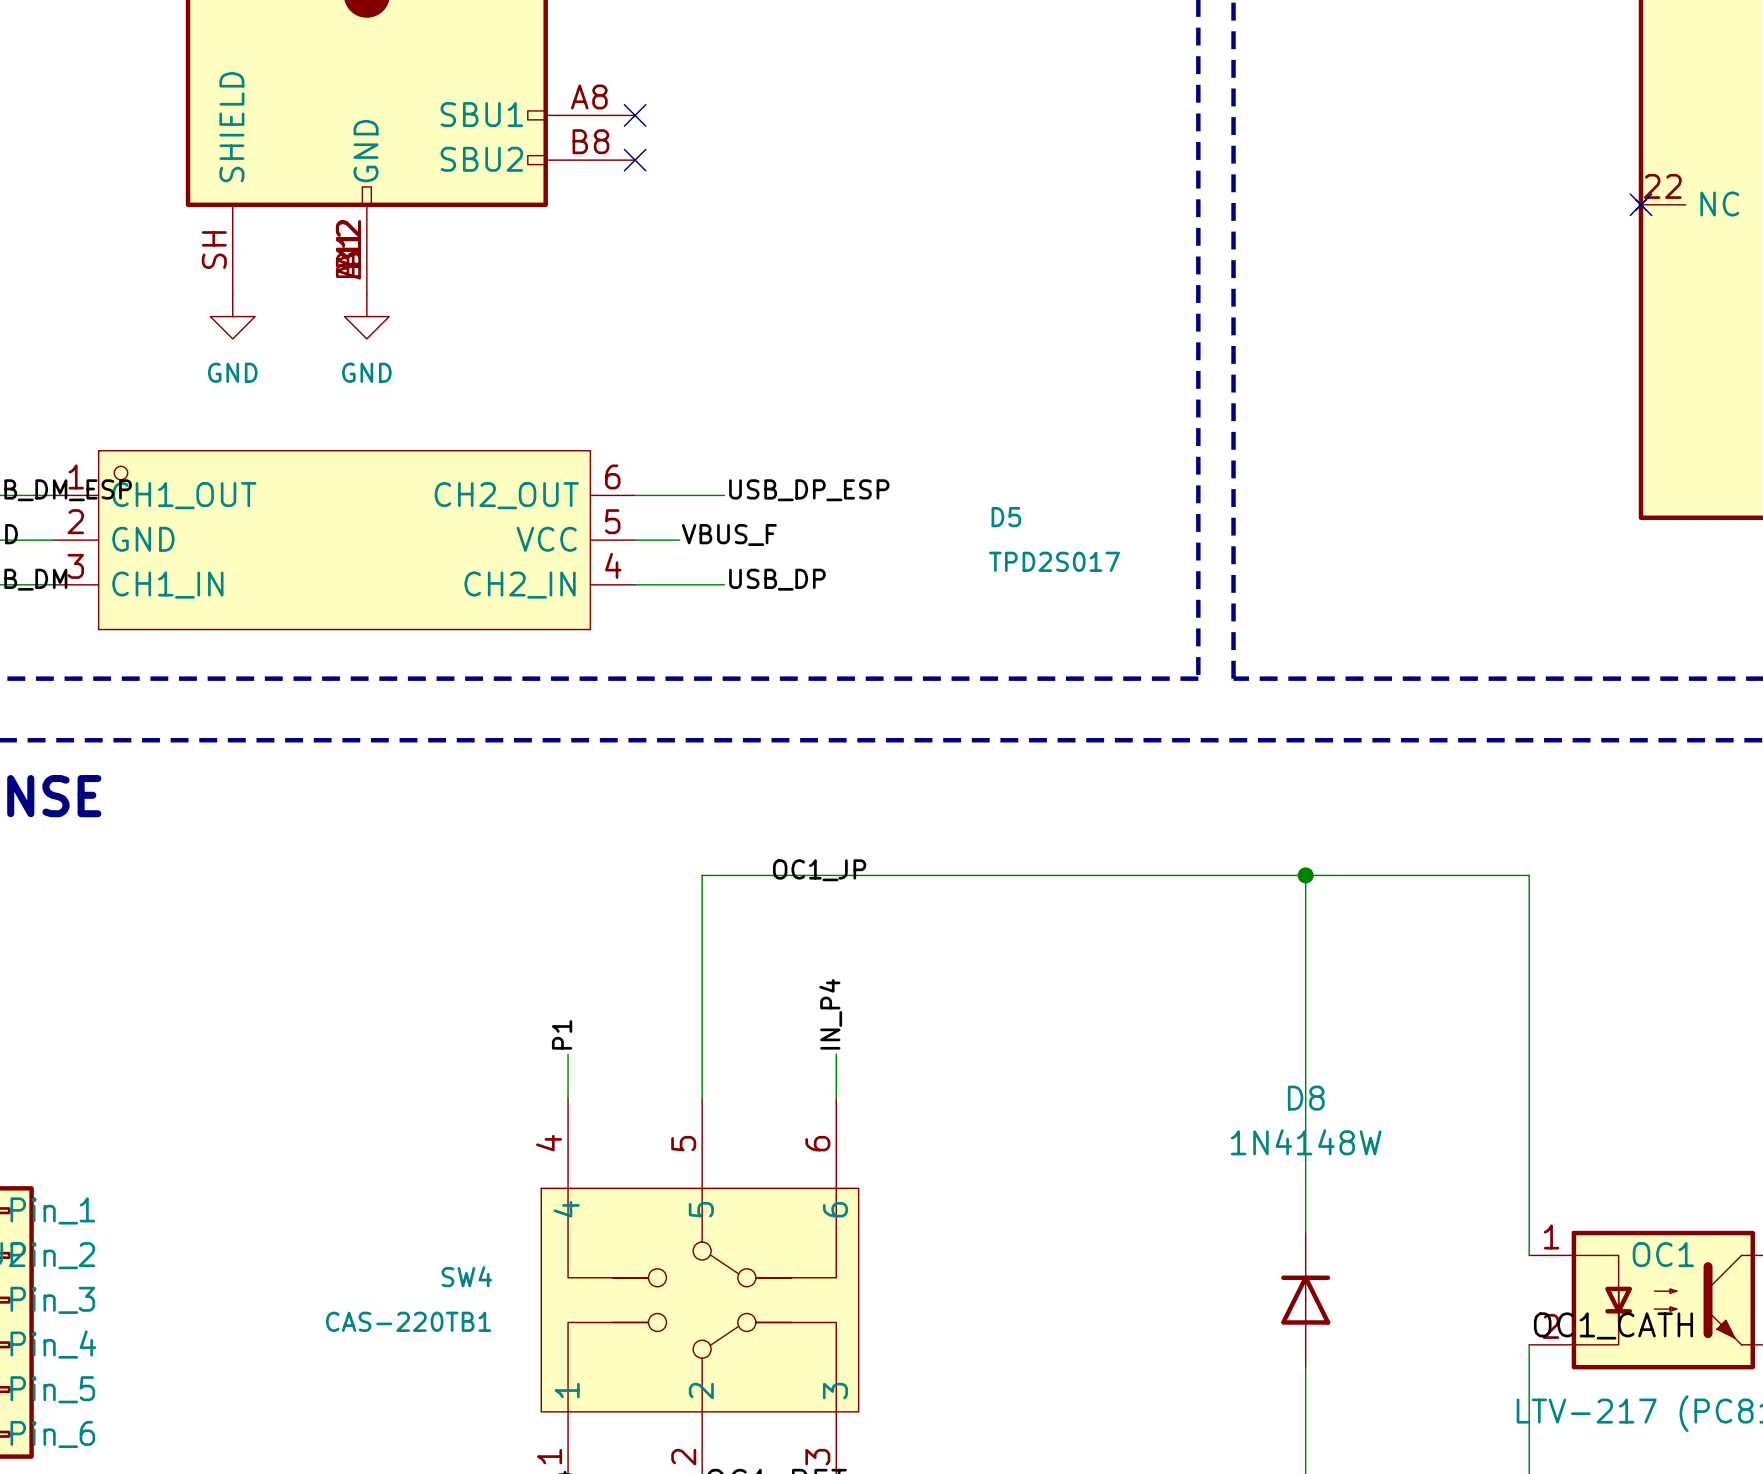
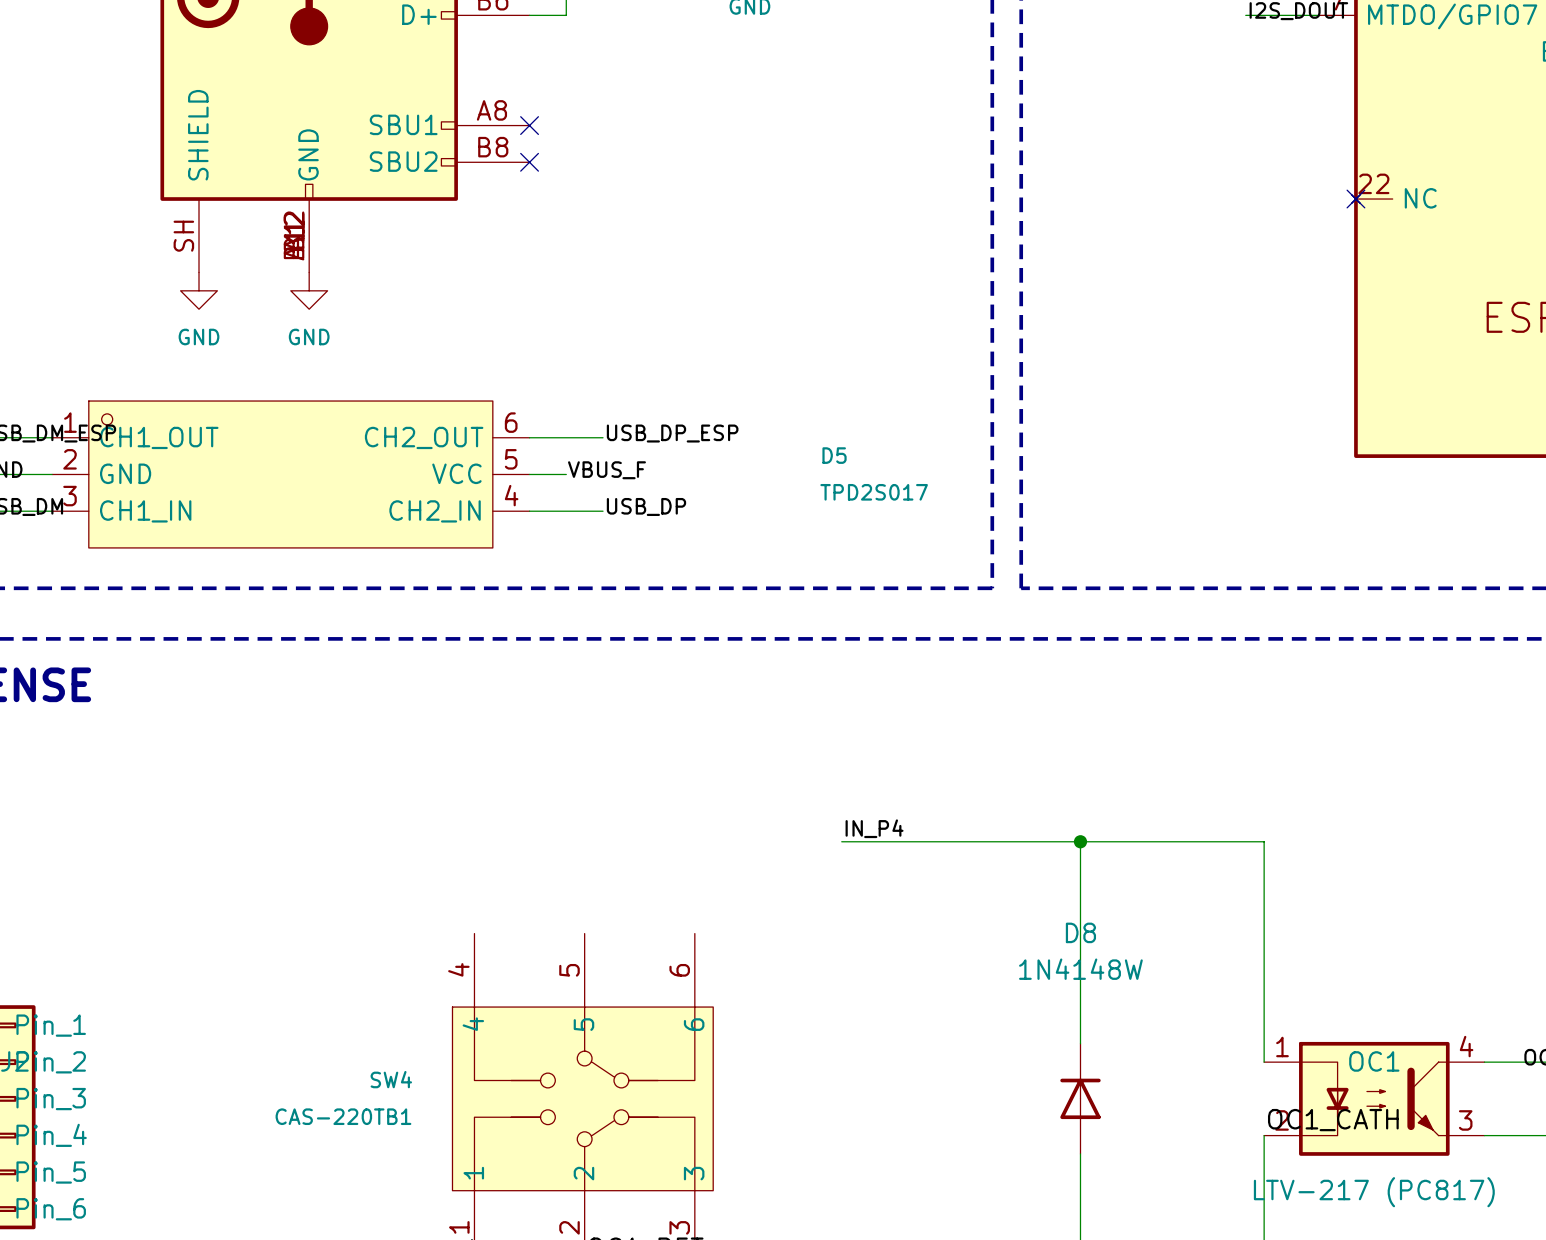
label: OC1_JP (819, 870) -> none
wire: (1305, 875) (1305, 987) -> none
junction: (1305, 875) -> none
junction: none -> (1080, 841)
wire: (1529, 987) (1529, 875) (702, 875) (702, 1098) -> (1264, 841) (841, 841)
label rotation: 0° (830, 1014) -> 90° clockwise (874, 828)
label position: IN_P4 (830, 1014) -> IN_P4 (874, 828)
label: P1 (562, 1034) -> none
wire: (568, 1054) (568, 1098) -> none
wire: (836, 1054) (836, 1098) -> none

